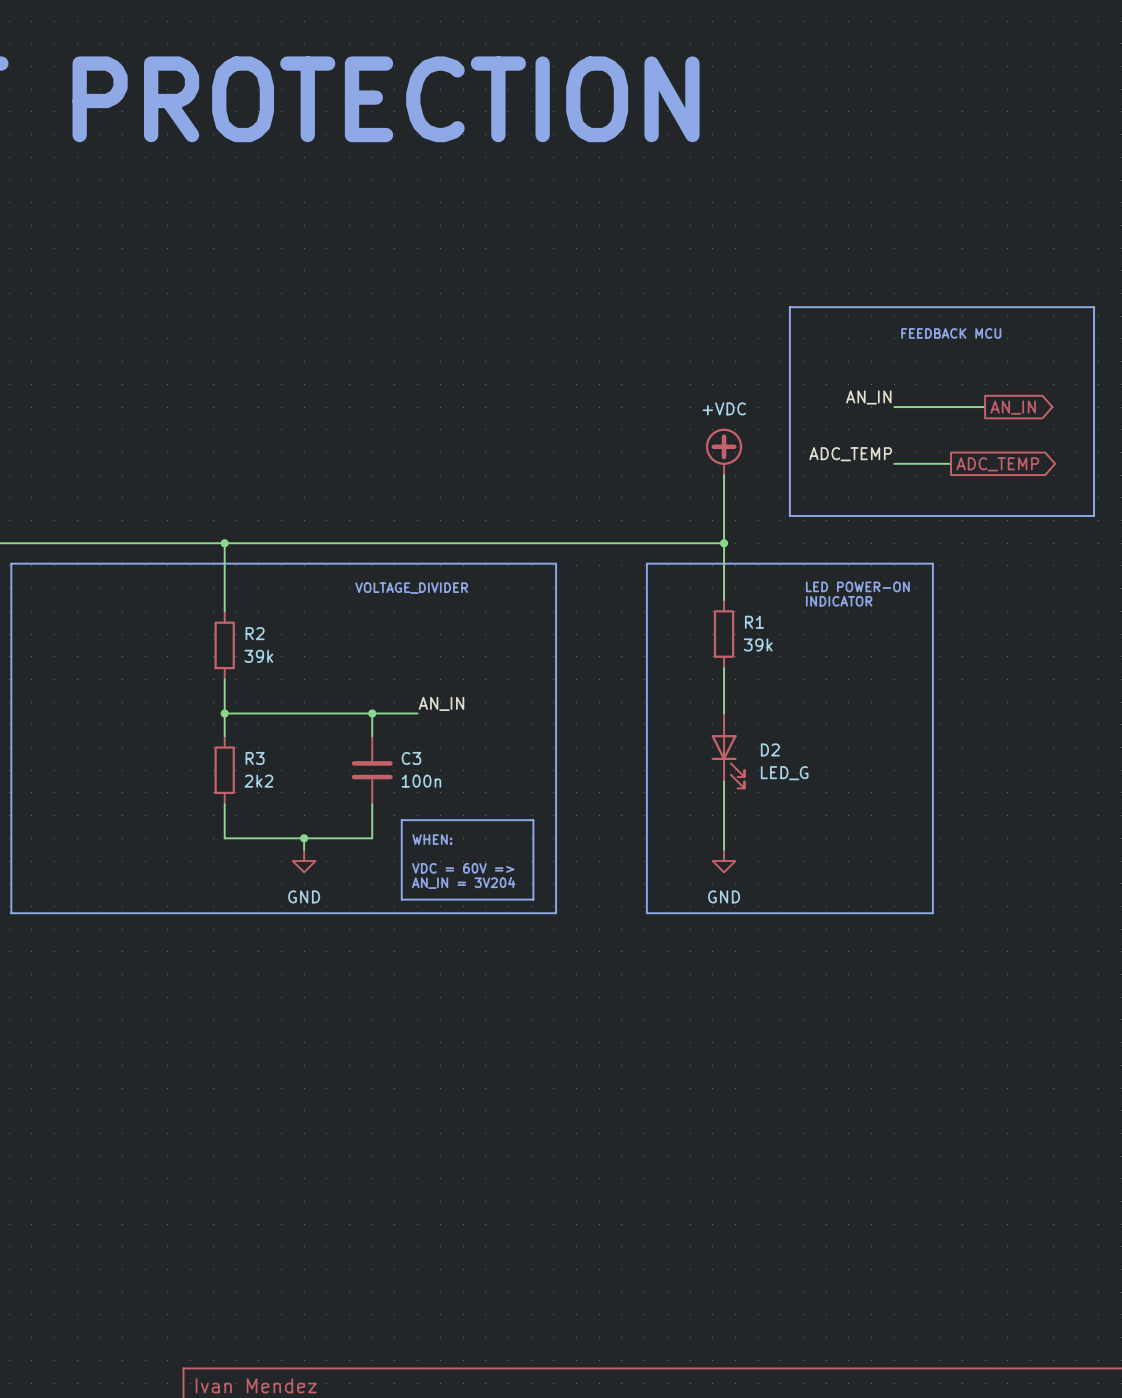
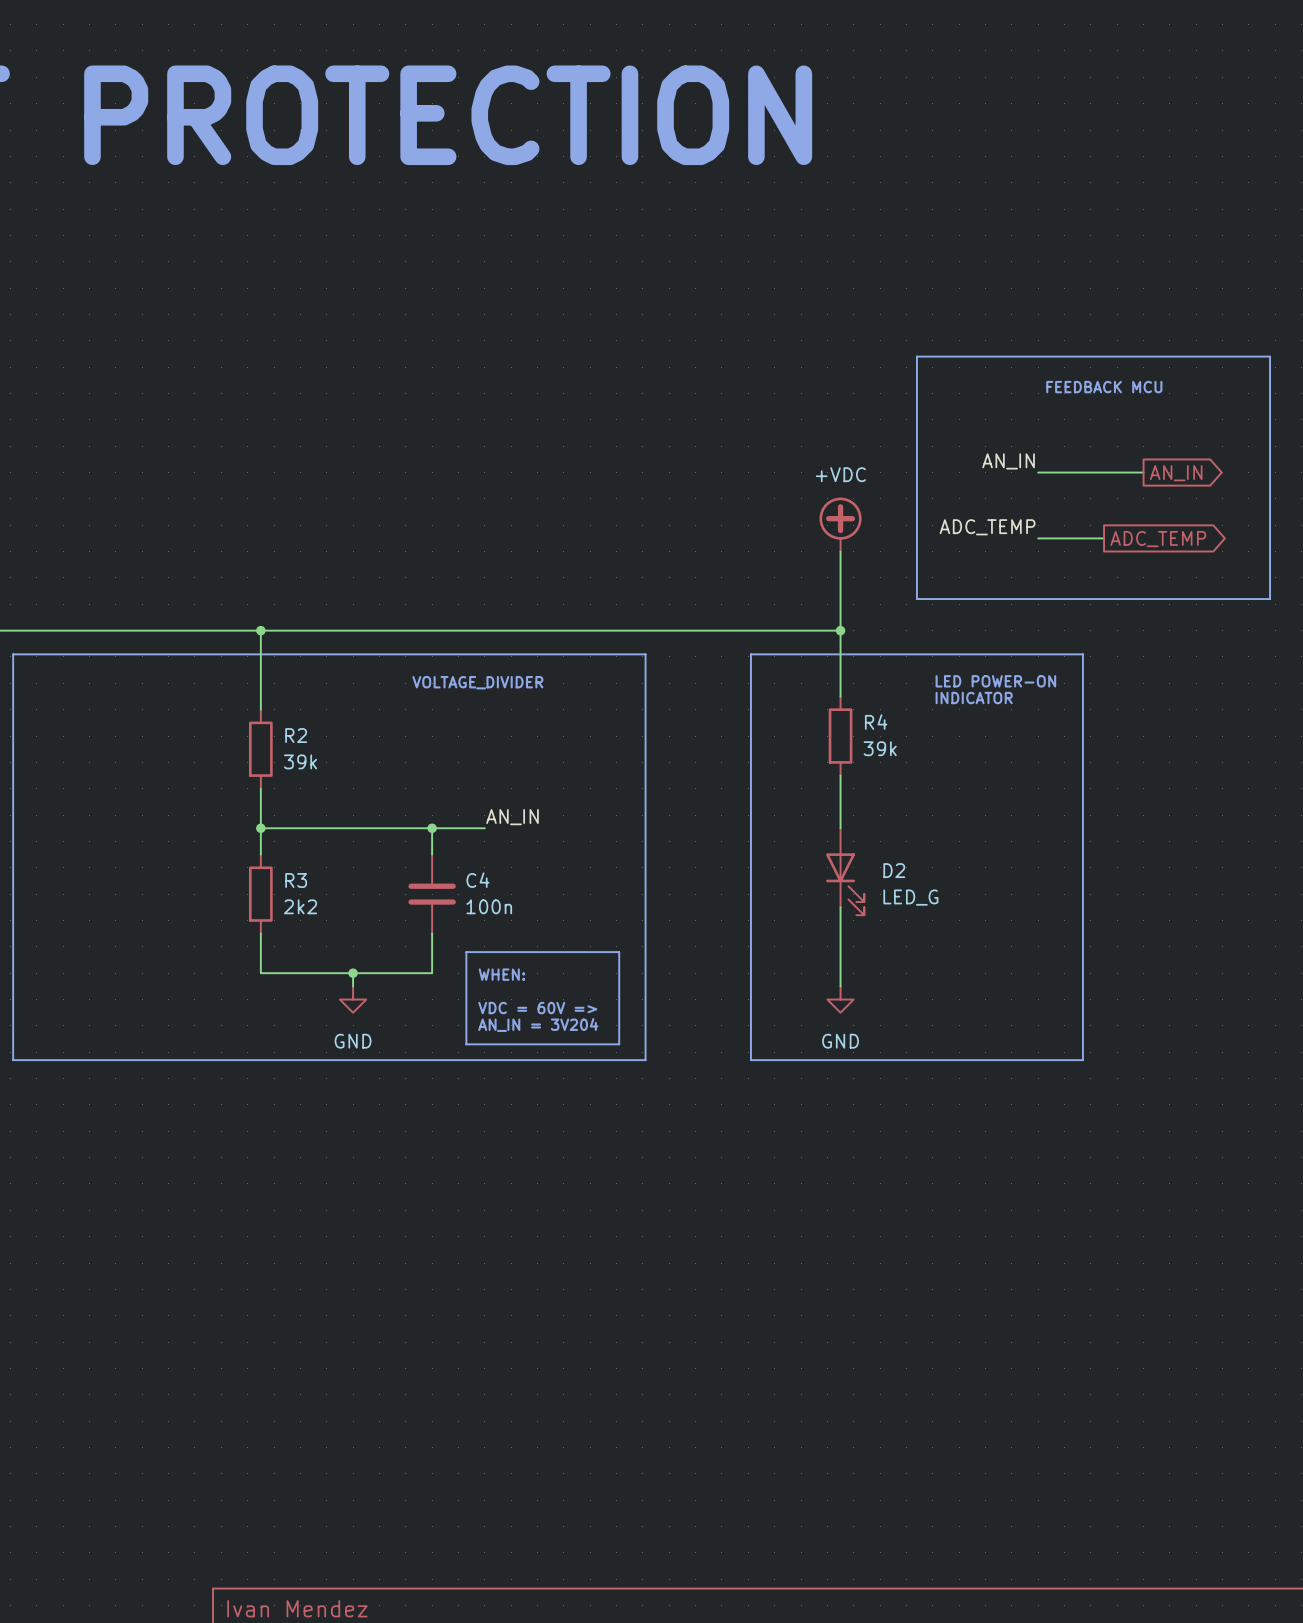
R1 name: R1 (754, 622) -> R4 (876, 722)
C3 name: C3 (411, 758) -> C4 (477, 880)

